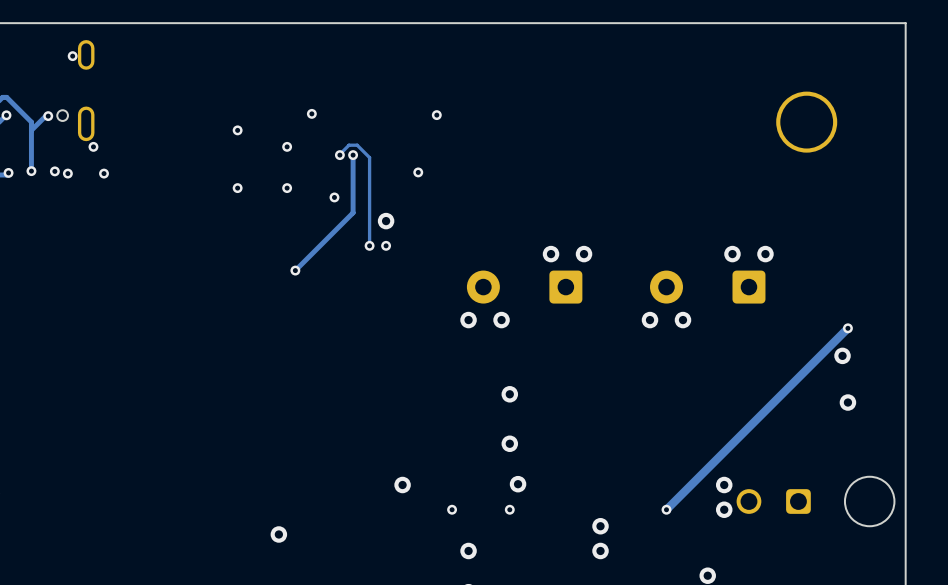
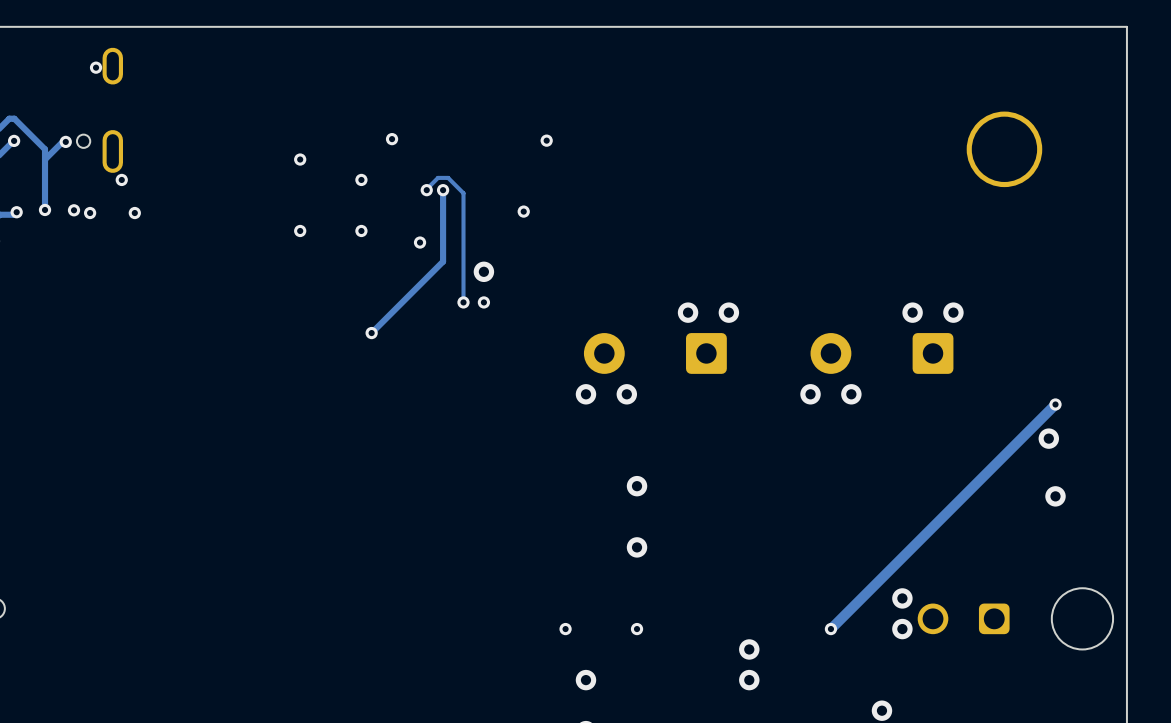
via: (518, 484) -> none
via: (402, 485) -> none
via: (278, 534) -> none

